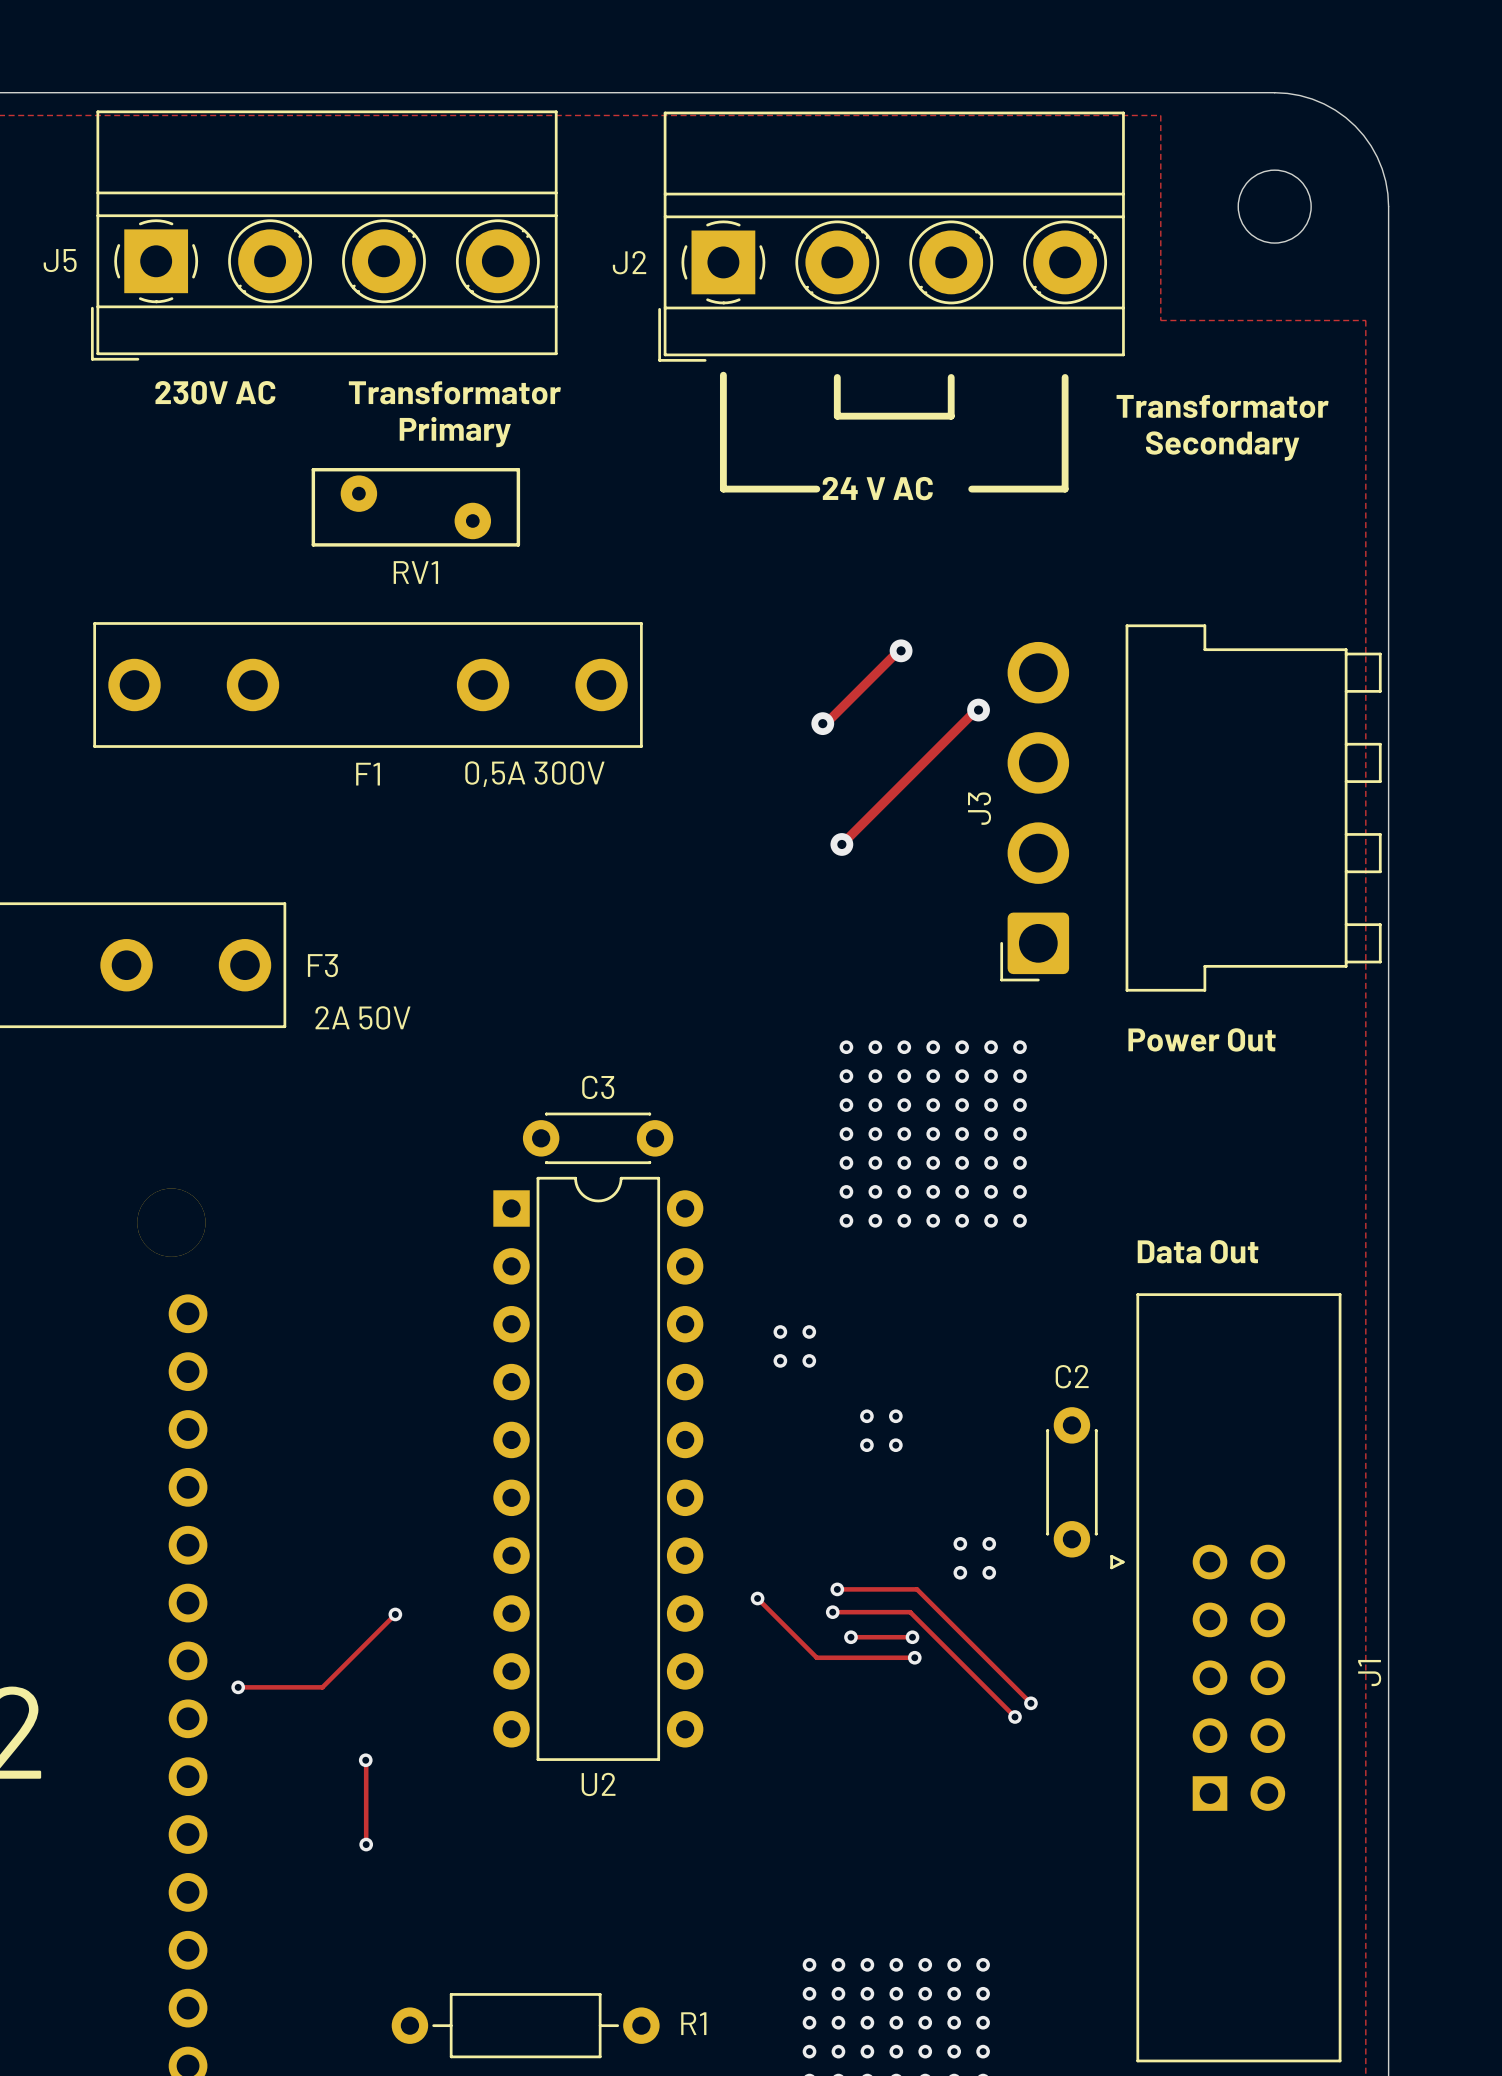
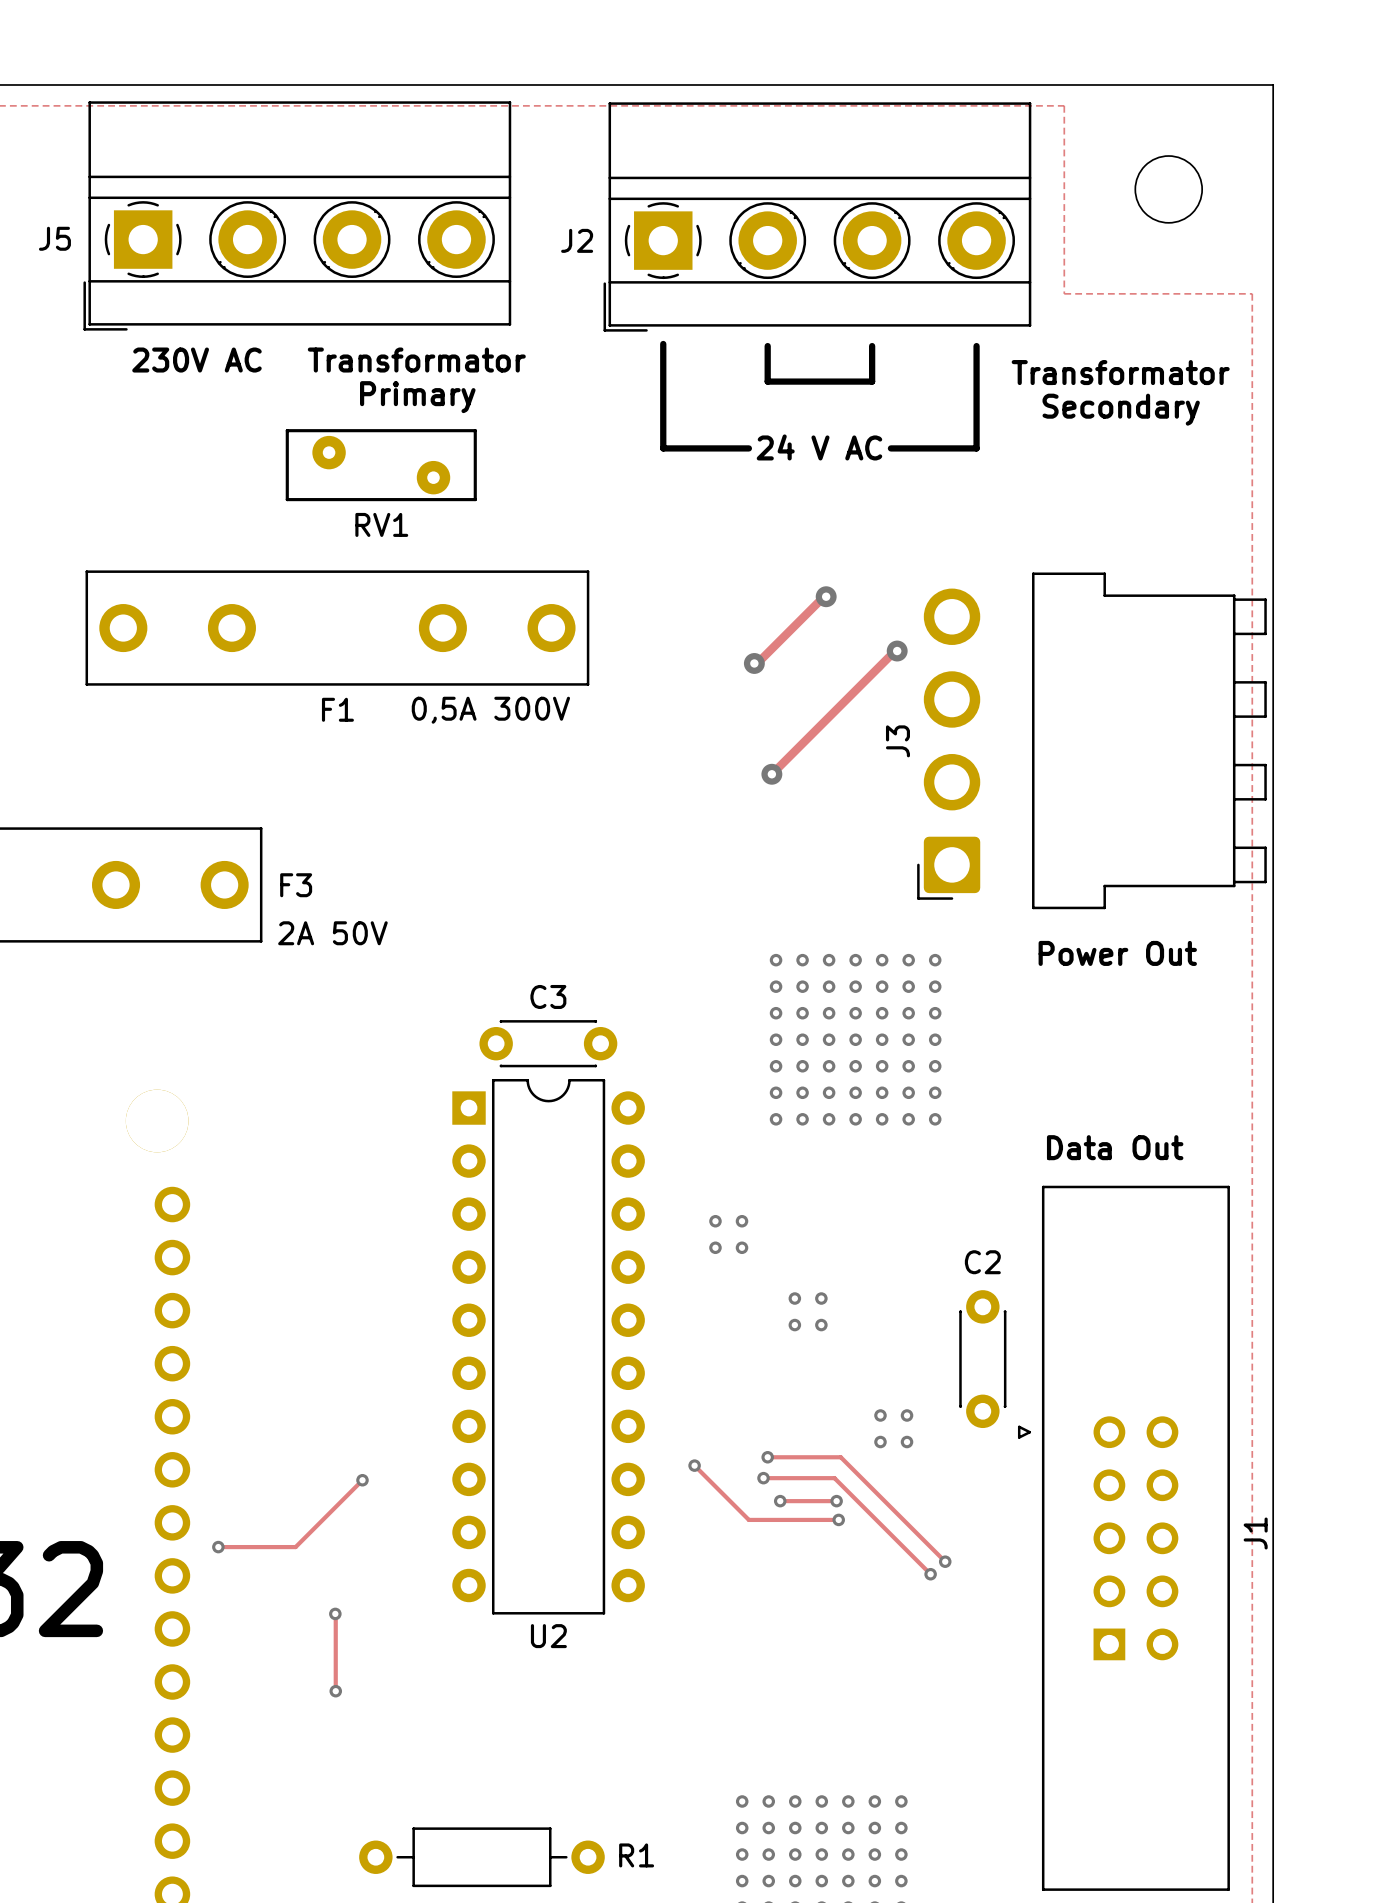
board edge: (1274, 92) (1312, 99) (1335, 110) (1355, 126) (1377, 157) (1385, 181) (1388, 206) -> (1168, 84) (1273, 84) (1273, 189)

